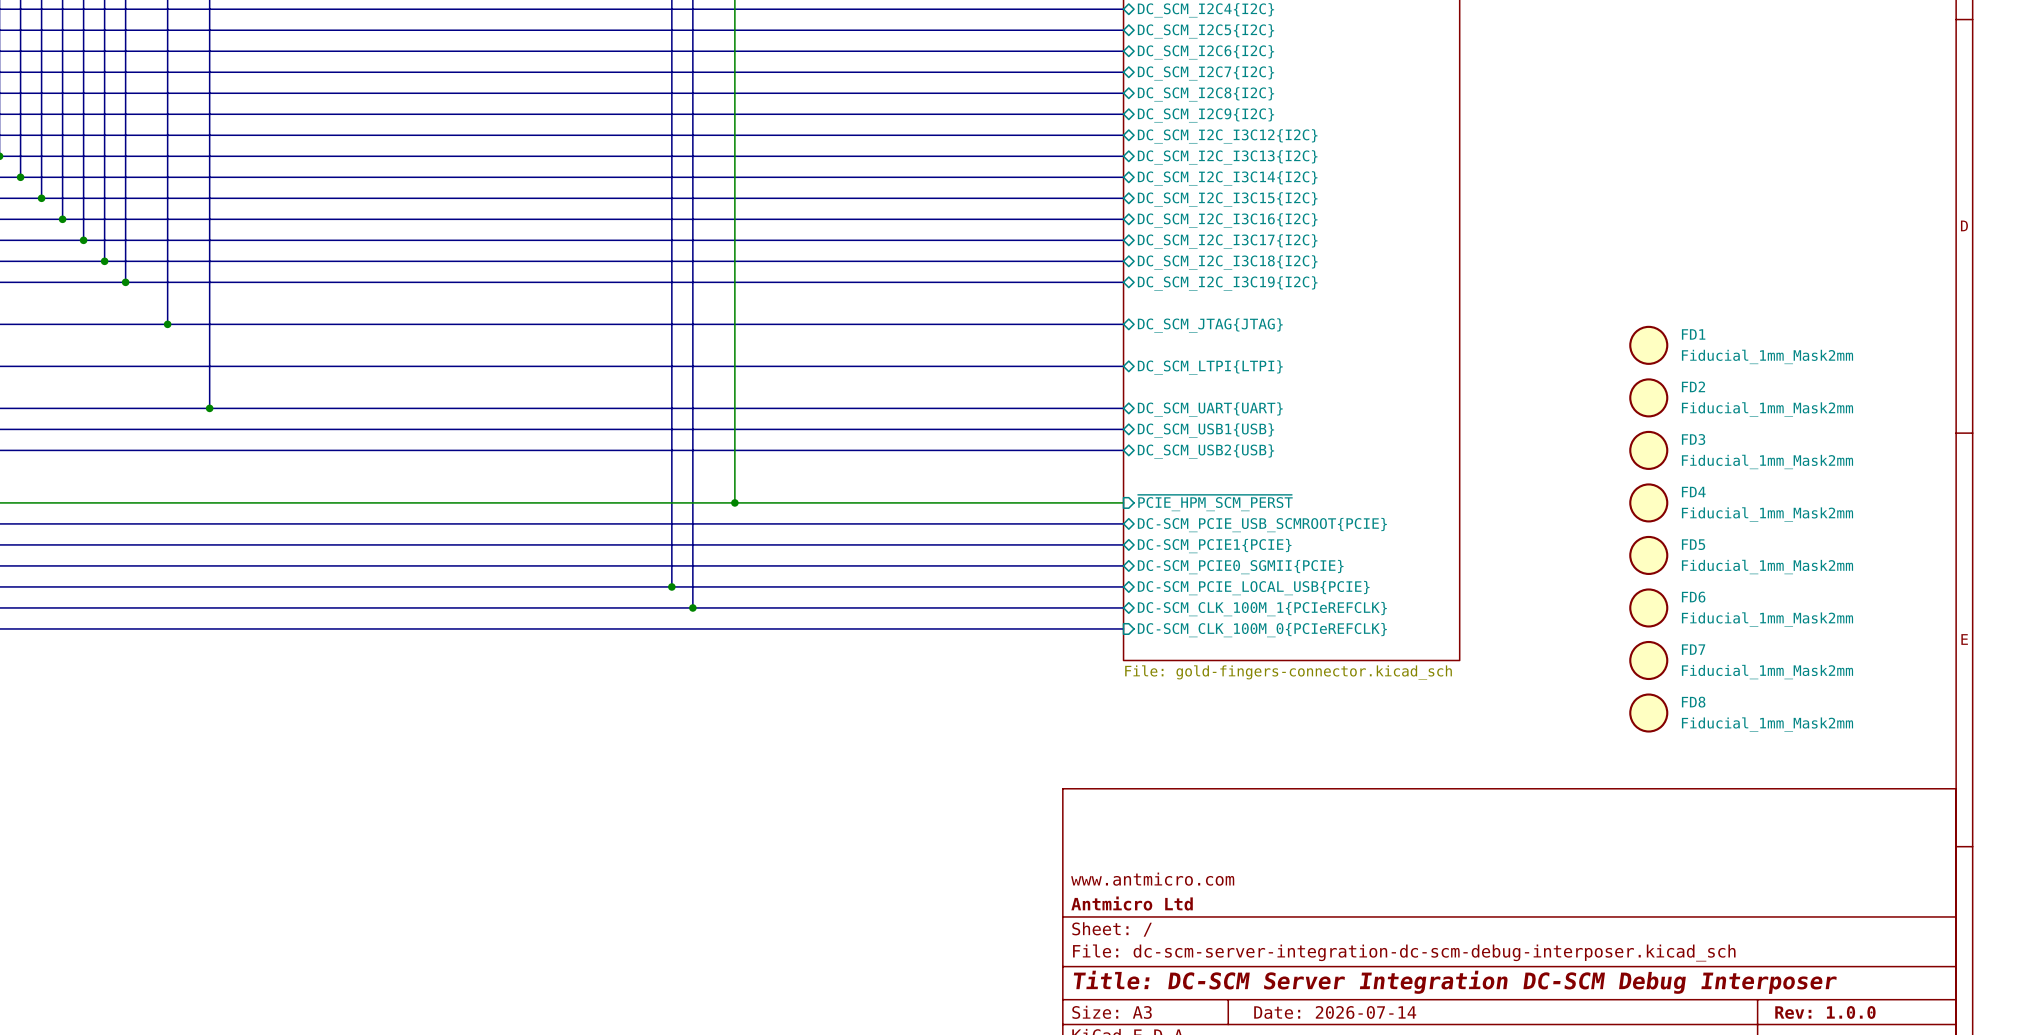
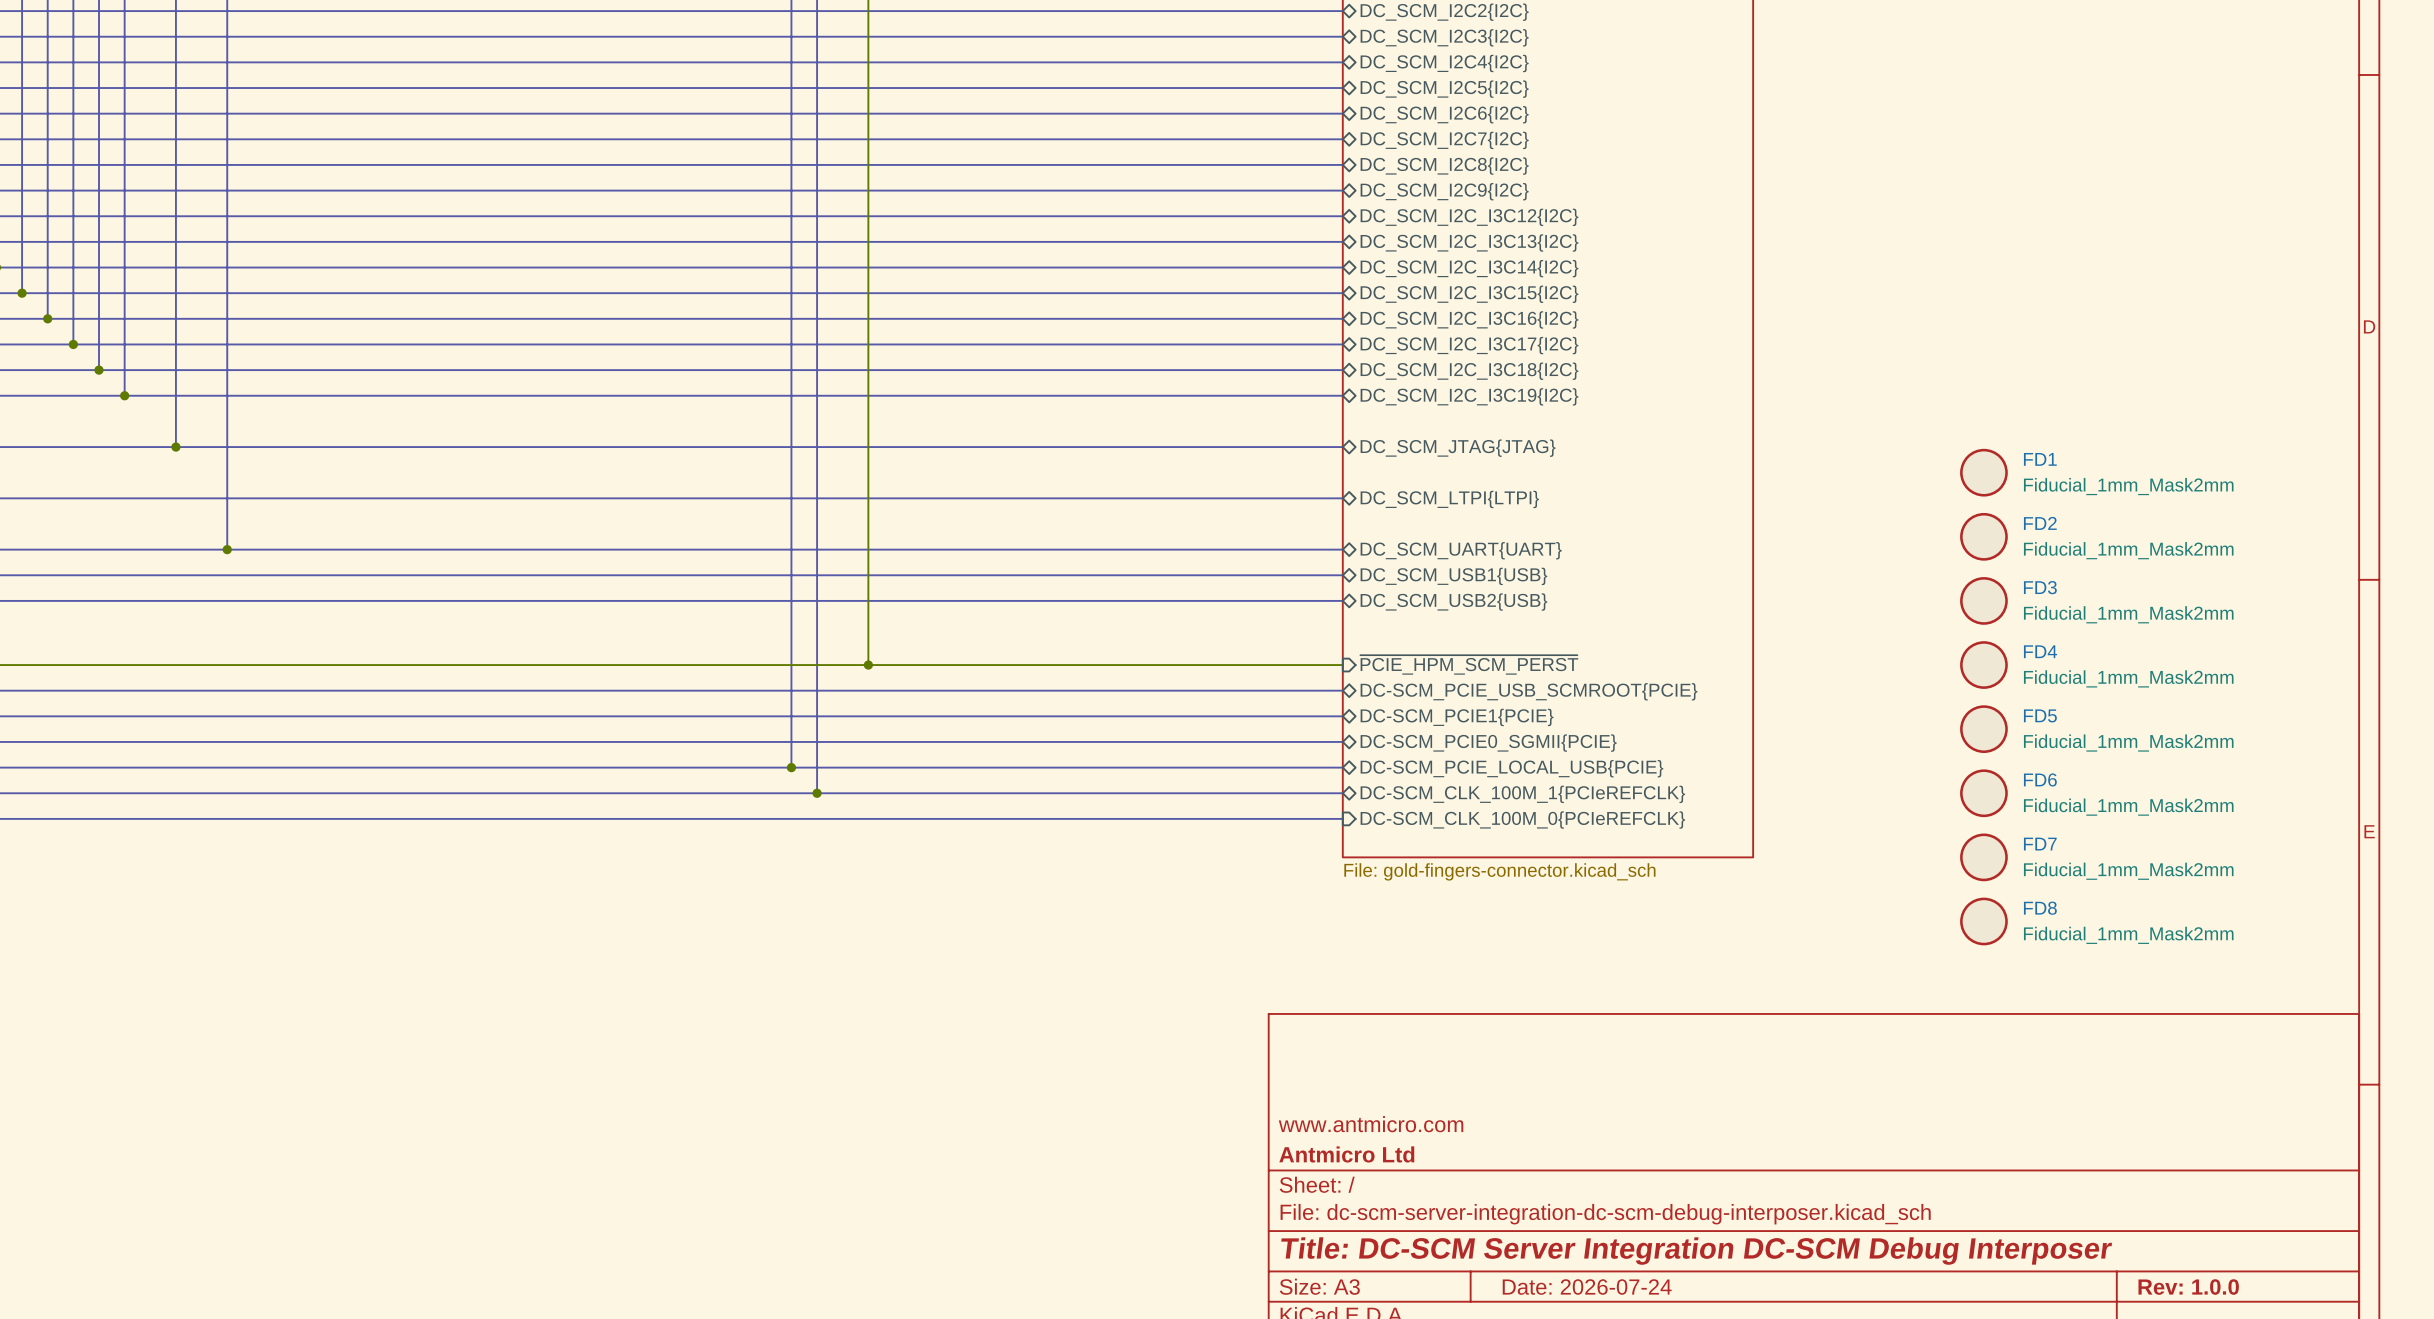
title block: Date: 2026-07-14 (1335, 1012) -> Date: 2026-07-24 (1587, 1287)

